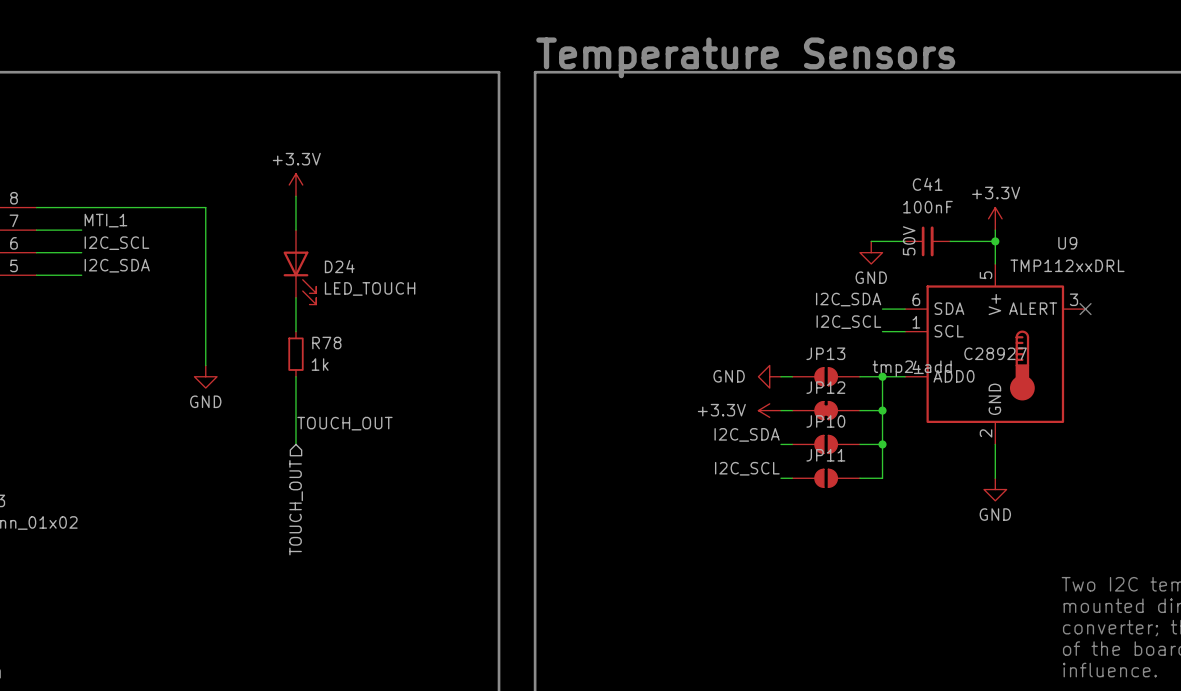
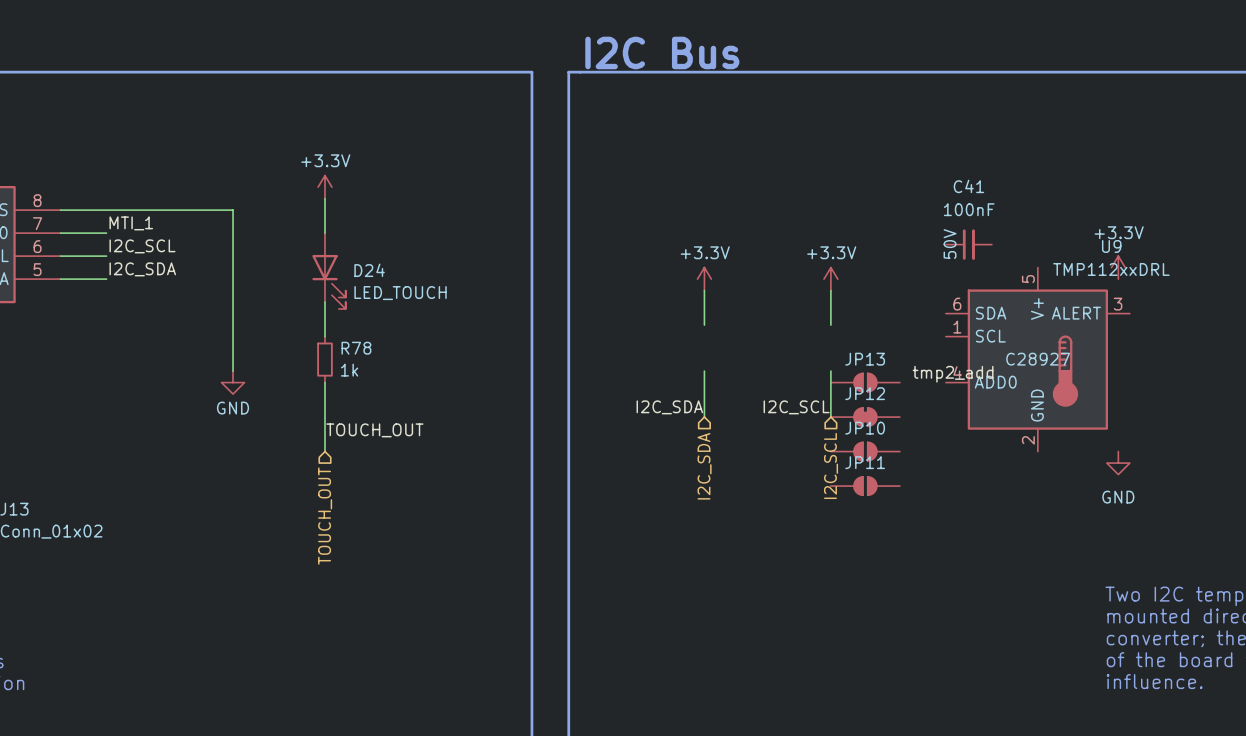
text: none -> I2C Bus (662, 52)
text: Temperature Sensors (745, 57) -> none
power symbol text position: +3.3V (996, 192) -> +3.3V (1119, 232)
power symbol position: +3.3V (995, 218) -> +3.3V (1118, 267)
wire: (995, 230) (995, 263) -> (830, 290) (830, 325)
wire: (871, 241) (905, 241) -> none
wire: (950, 241) (995, 241) -> none
junction: (995, 241) -> none
power symbol: GND (871, 252) -> none
power symbol: none -> +3.3V (704, 279)
power symbol: none -> +3.3V (830, 279)
wire: none -> (704, 290) (704, 325)
label: I2C_SDA (848, 299) -> none
wire: (882, 309) (905, 309) -> none
no-connect mark: (1085, 309) -> none
label: I2C_SCL (848, 322) -> none
wire: (882, 331) (905, 331) -> none
wire: none -> (704, 371) (704, 417)
power symbol: GND (769, 376) -> none
wire: (781, 376) (792, 376) -> none
wire: (859, 376) (905, 376) -> none
wire: (882, 376) (882, 478) (859, 478) -> none
junction: (882, 376) -> none
label: none -> I2C_SCL (796, 407)
power symbol: +3.3V (769, 410) -> none
wire: (781, 410) (792, 410) -> (830, 371) (830, 417)
wire: (859, 410) (882, 410) -> none
junction: (882, 410) -> none
label position: I2C_SDA (747, 434) -> I2C_SDA (669, 407)
wire: (781, 444) (792, 444) -> none
wire: (859, 444) (882, 444) -> none
junction: (882, 444) -> none
wire: (995, 444) (995, 478) -> none
hierarchical label: none -> I2C_SDA (704, 466)
hierarchical label: none -> I2C_SCL (831, 465)
label: I2C_SCL (747, 468) -> none
wire: (781, 478) (792, 478) -> none
power symbol position: GND (995, 489) -> GND (1118, 463)
power symbol text position: GND (995, 514) -> GND (1118, 497)

